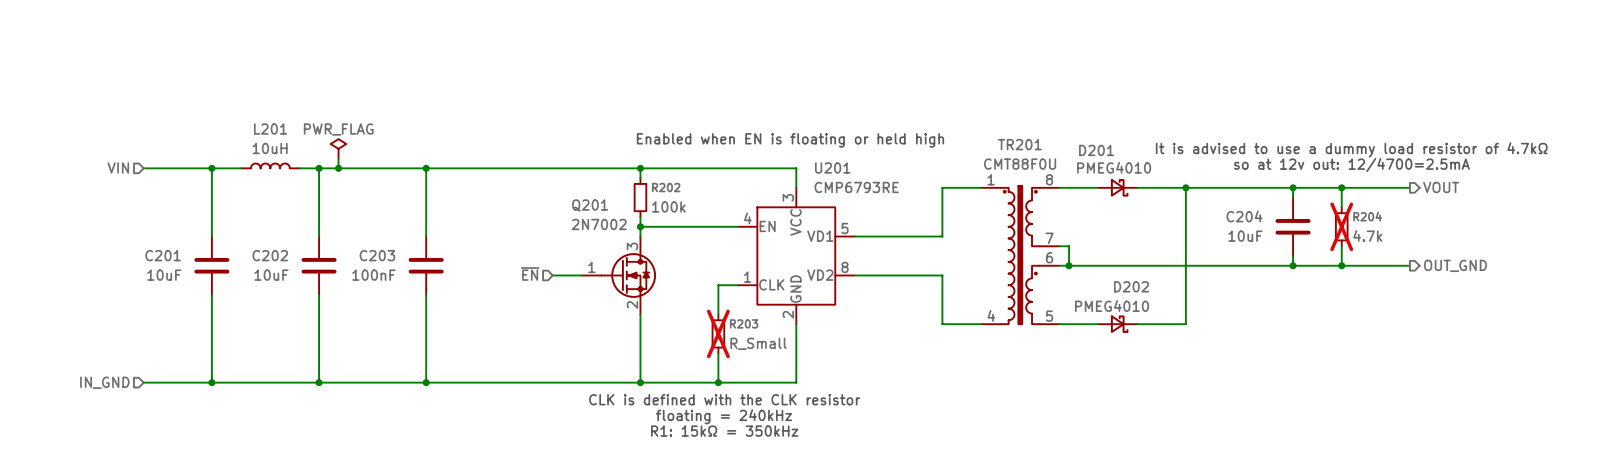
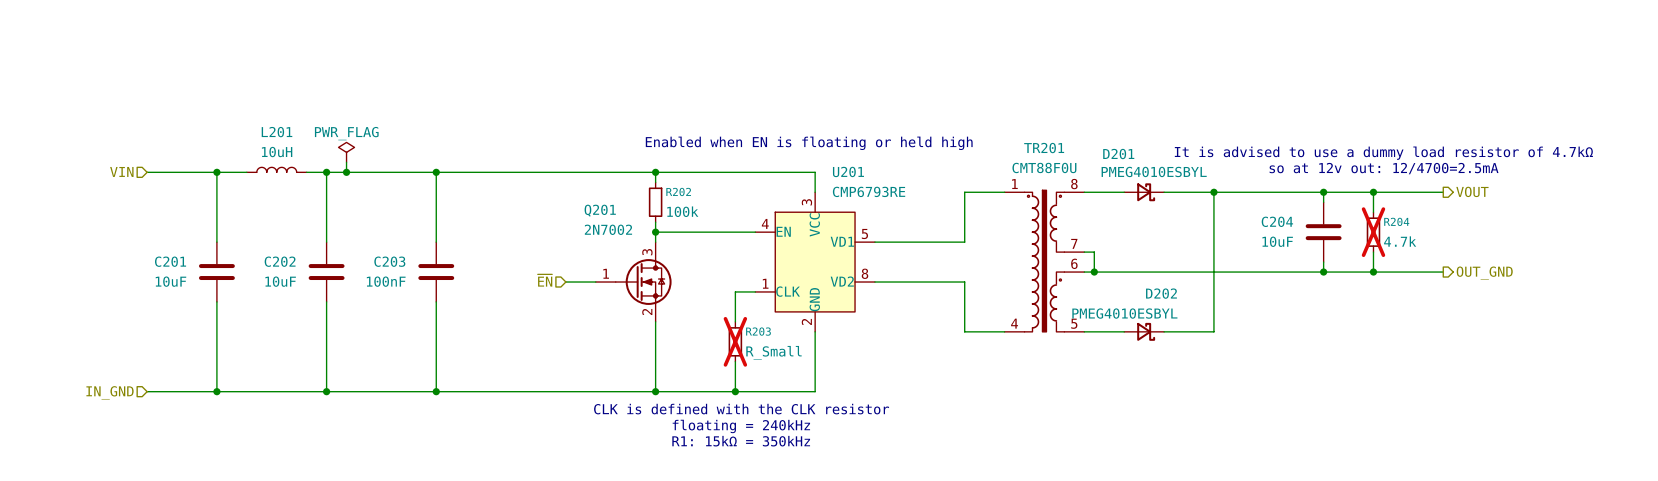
D201 value: PMEG4010 (1114, 167) -> PMEG4010ESBYL (1154, 171)
D202 value: PMEG4010 (1112, 306) -> PMEG4010ESBYL (1124, 313)

